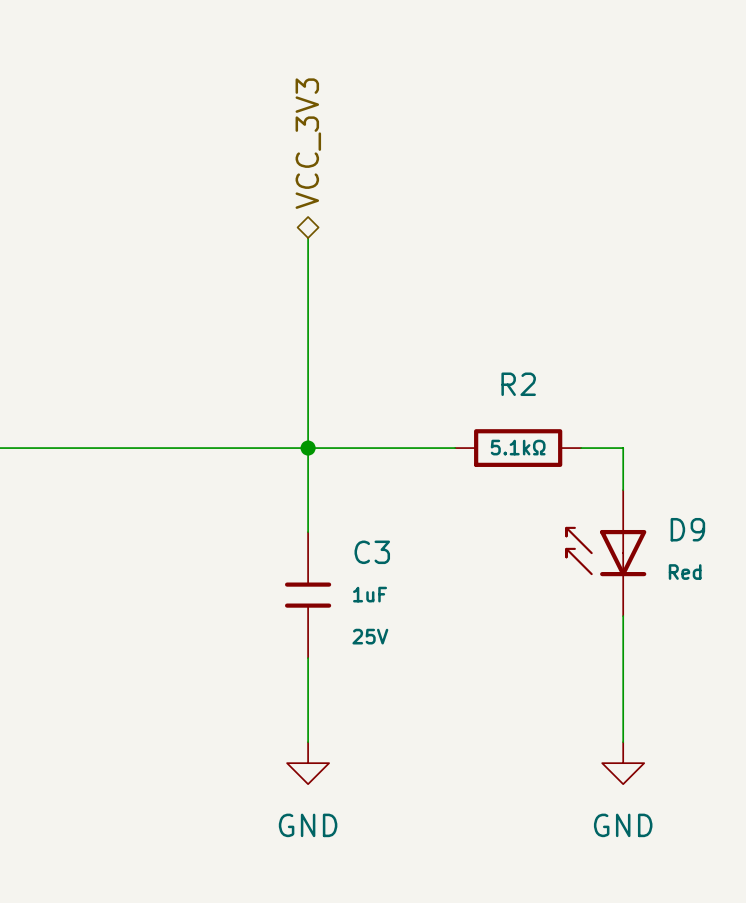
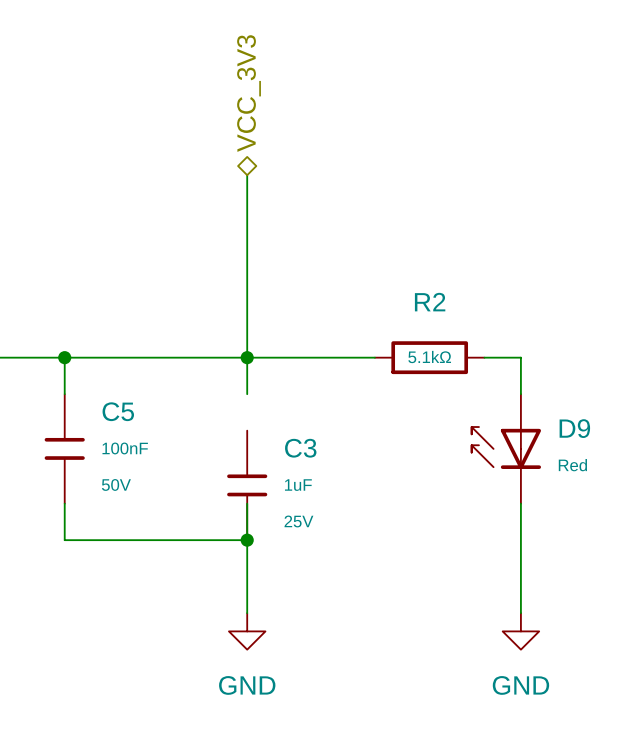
junction: none -> (64, 357)
wire: (308, 490) (308, 532) -> (64, 357) (64, 394)
C5: none -> 100nF (64, 448)
wire: none -> (64, 503) (64, 540) (247, 540) (247, 503)
junction: none -> (247, 540)

